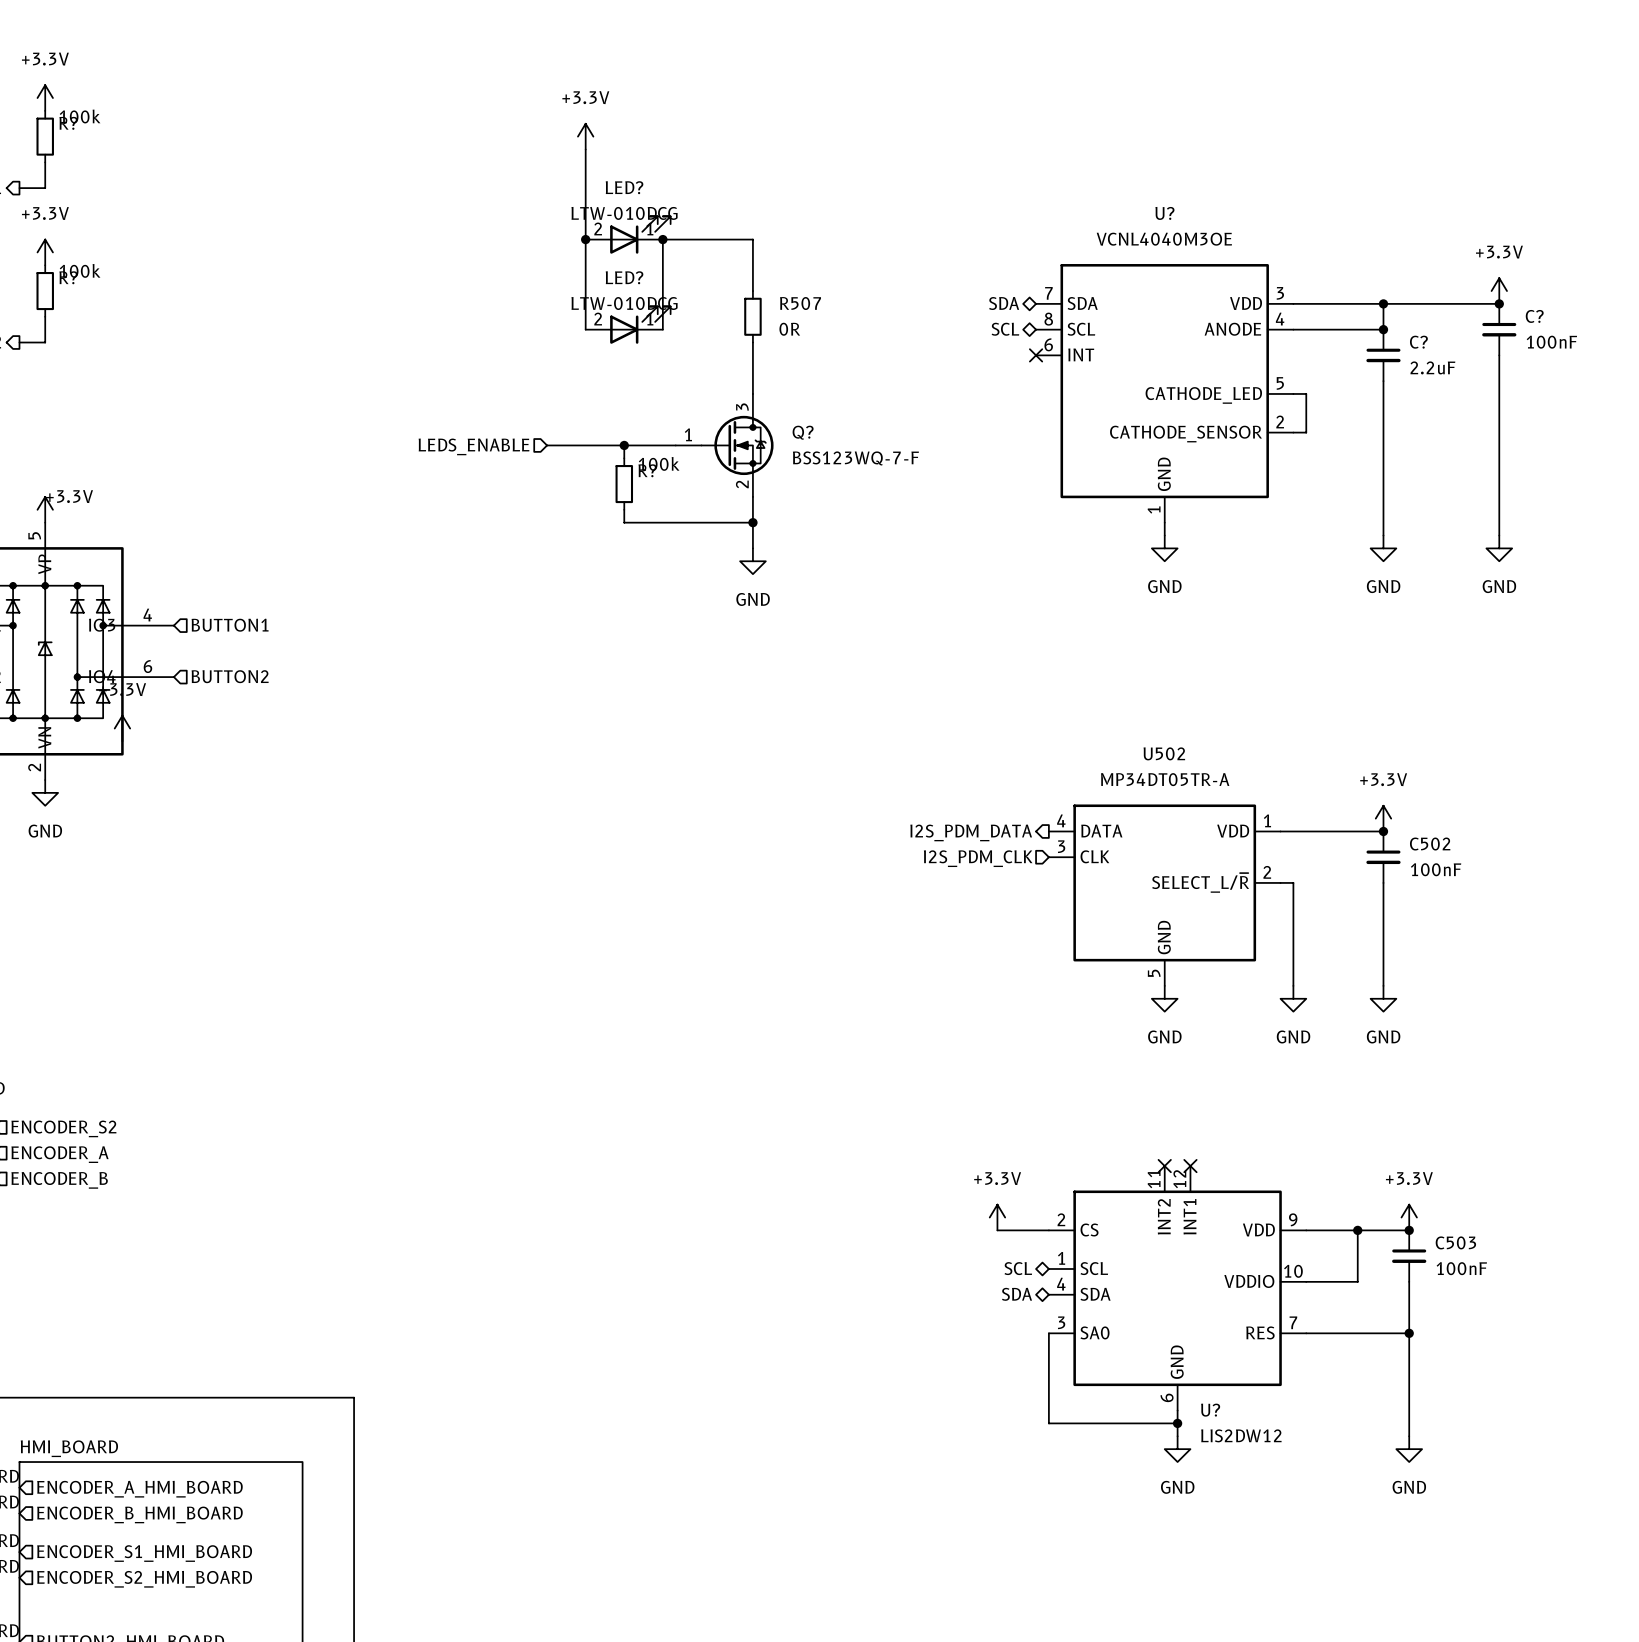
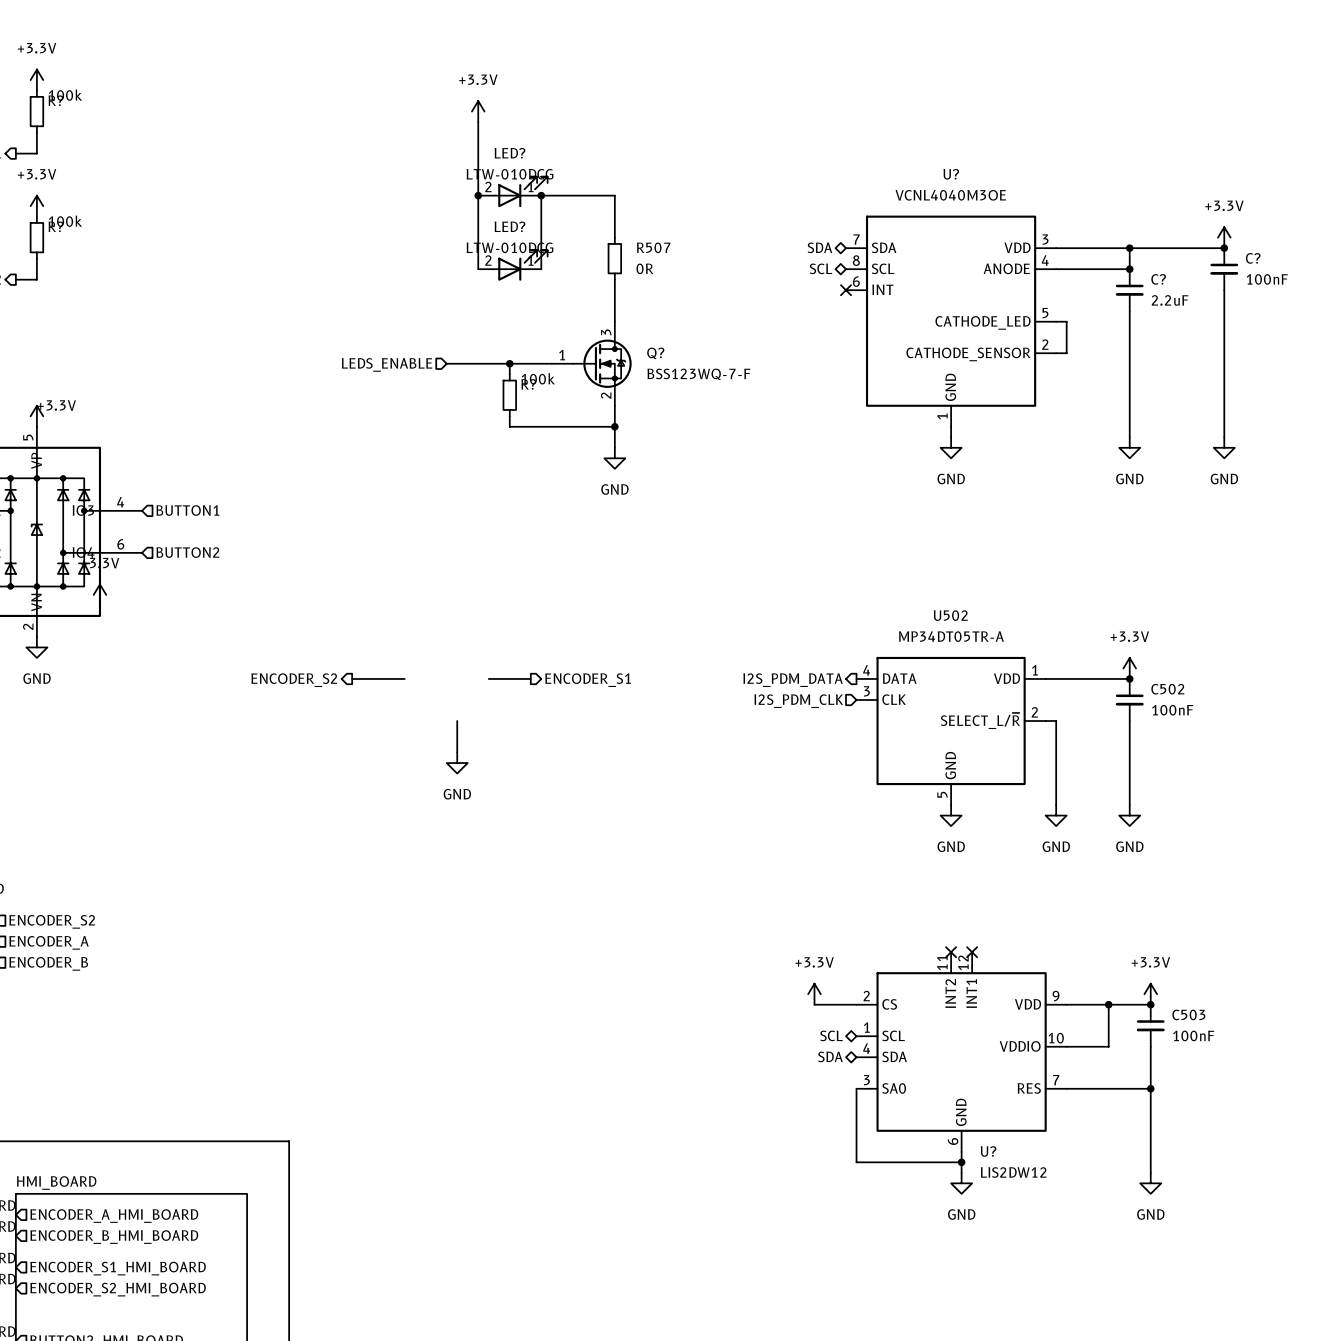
wire: none -> (352, 678) (404, 678)
wire: none -> (488, 678) (530, 678)
hierarchical label: none -> ENCODER_S2 (294, 680)
hierarchical label: none -> ENCODER_S1 (588, 680)
wire: none -> (457, 721) (457, 752)
power symbol: none -> GND (457, 763)

